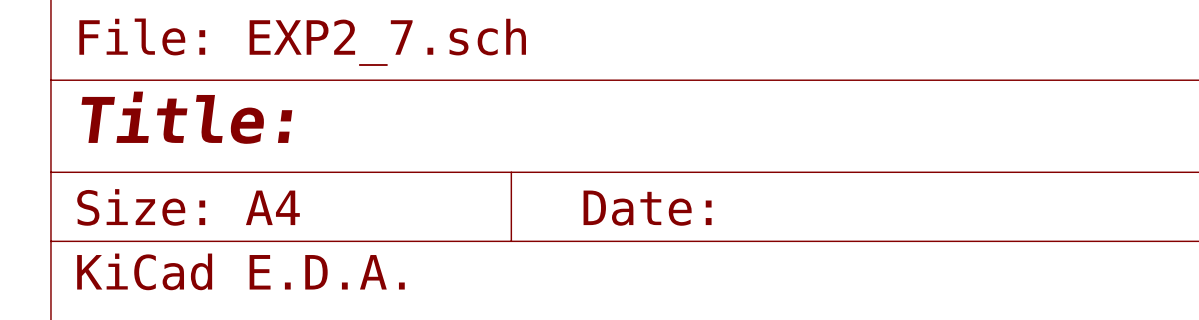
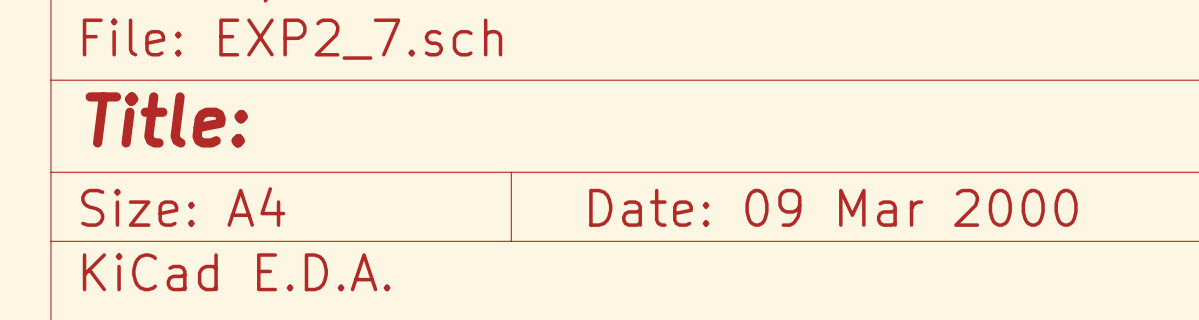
title block: Date: (647, 208) -> Date: 09 Mar 2000 (833, 207)

